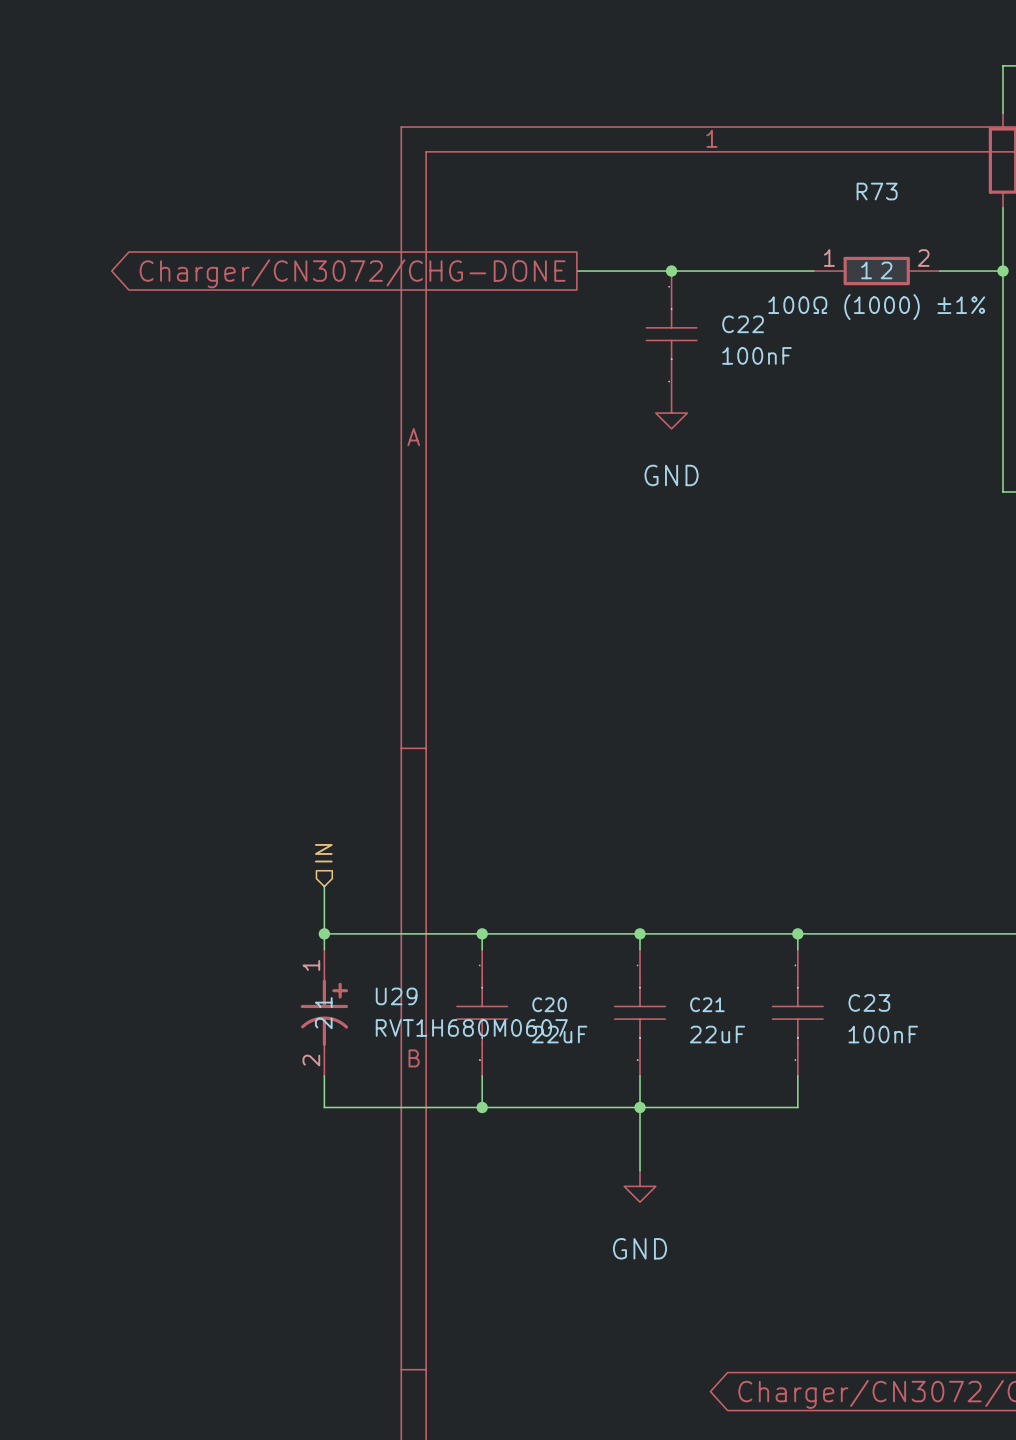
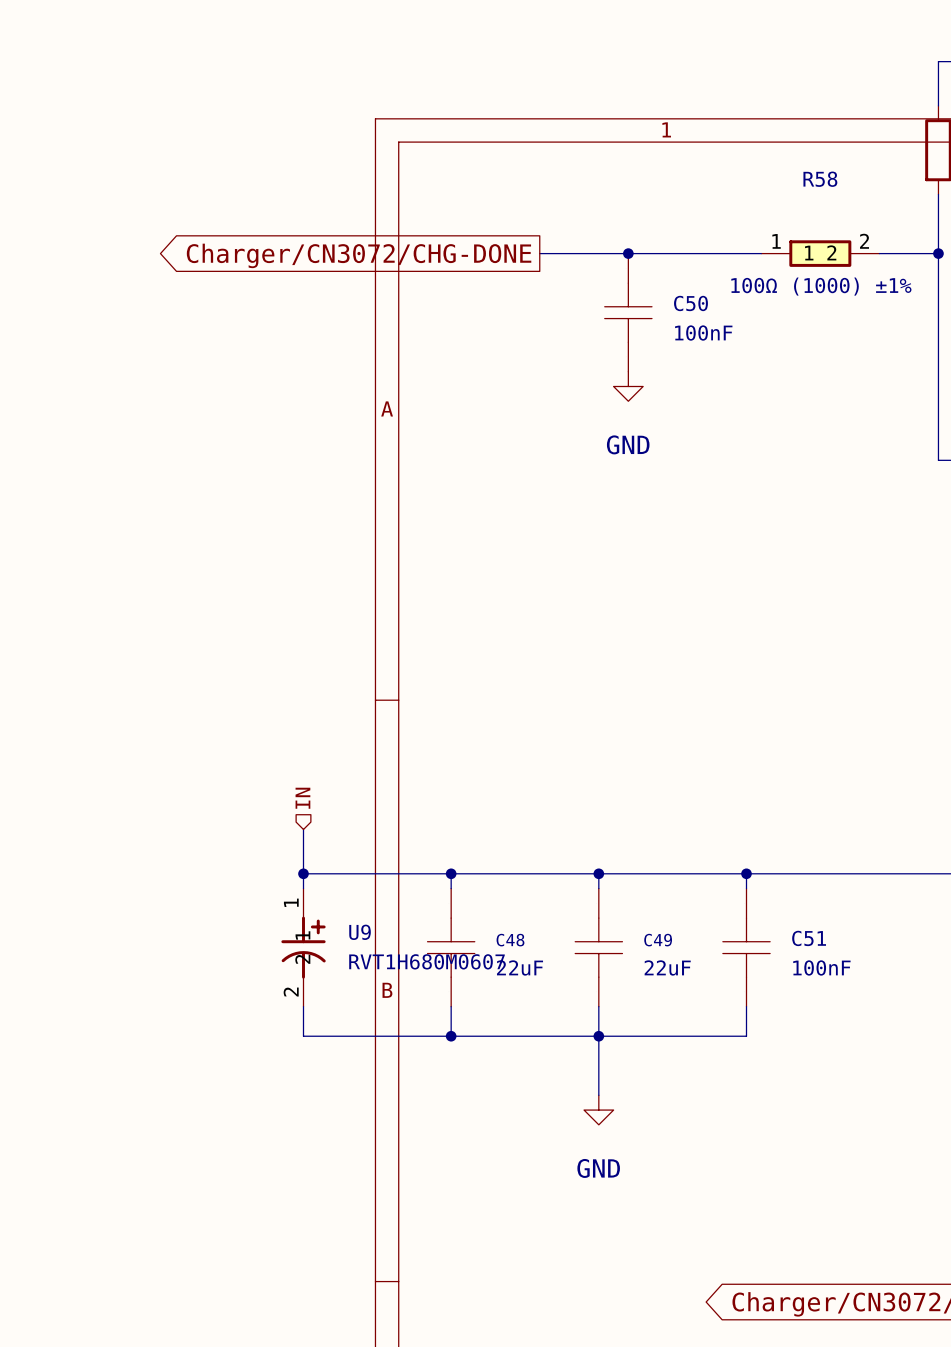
R73 name: R73 (877, 191) -> R58 (820, 179)
C22 name: C22 (743, 324) -> C50 (690, 303)
U29 name: U29 (396, 996) -> U9 (360, 932)
C23 name: C23 (869, 1002) -> C51 (809, 938)
C20 name: C20 (549, 1004) -> C48 (510, 940)
C21 name: C21 (707, 1004) -> C49 (658, 940)

